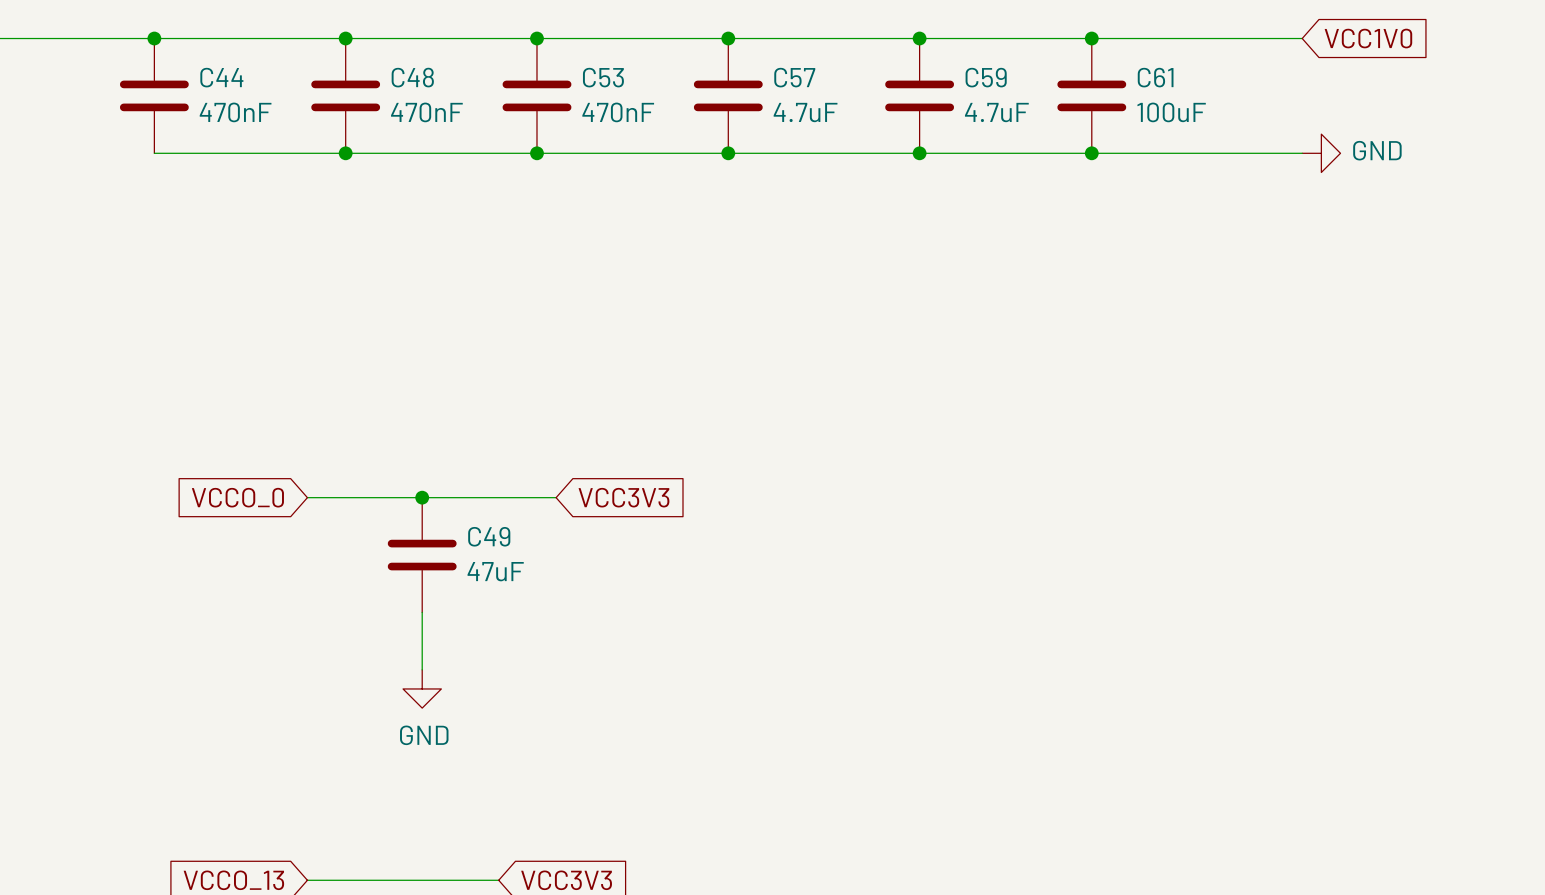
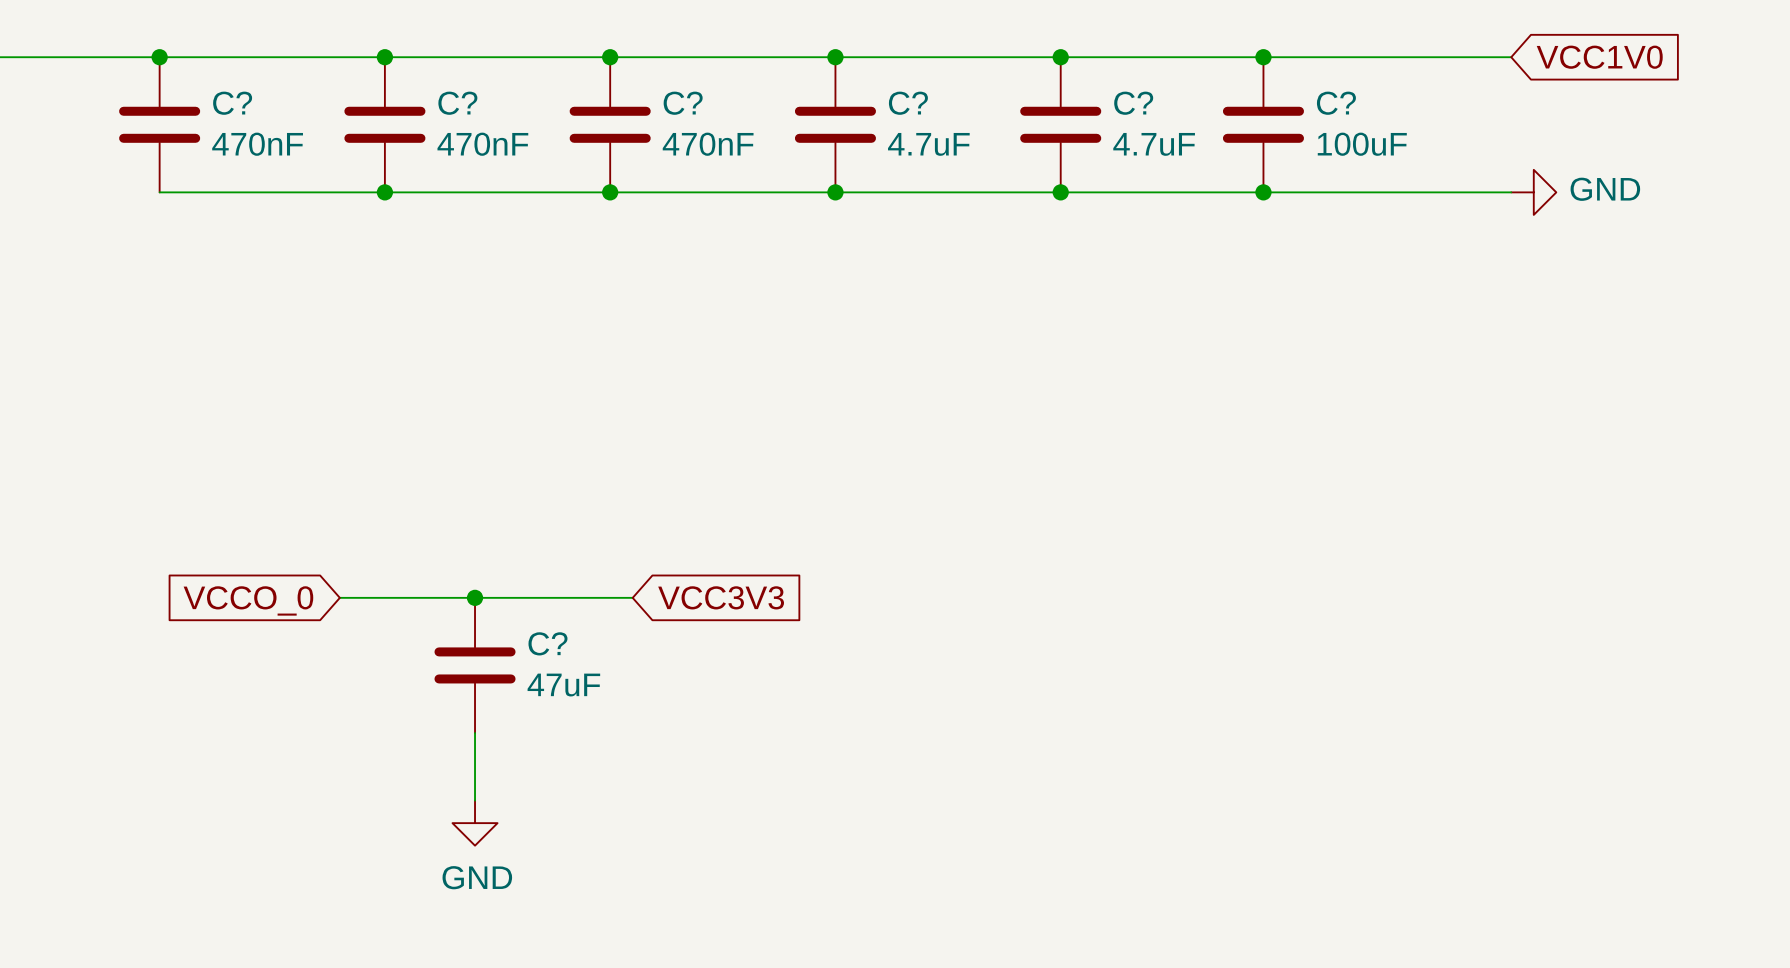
C44 name: C44 (221, 77) -> C? (232, 103)
C48 name: C48 (412, 77) -> C? (457, 103)
C53 name: C53 (603, 77) -> C? (683, 103)
C57 name: C57 (794, 77) -> C? (908, 103)
C59 name: C59 (986, 77) -> C? (1133, 103)
C61 name: C61 (1155, 77) -> C? (1336, 103)
C49 name: C49 (489, 536) -> C? (547, 643)

